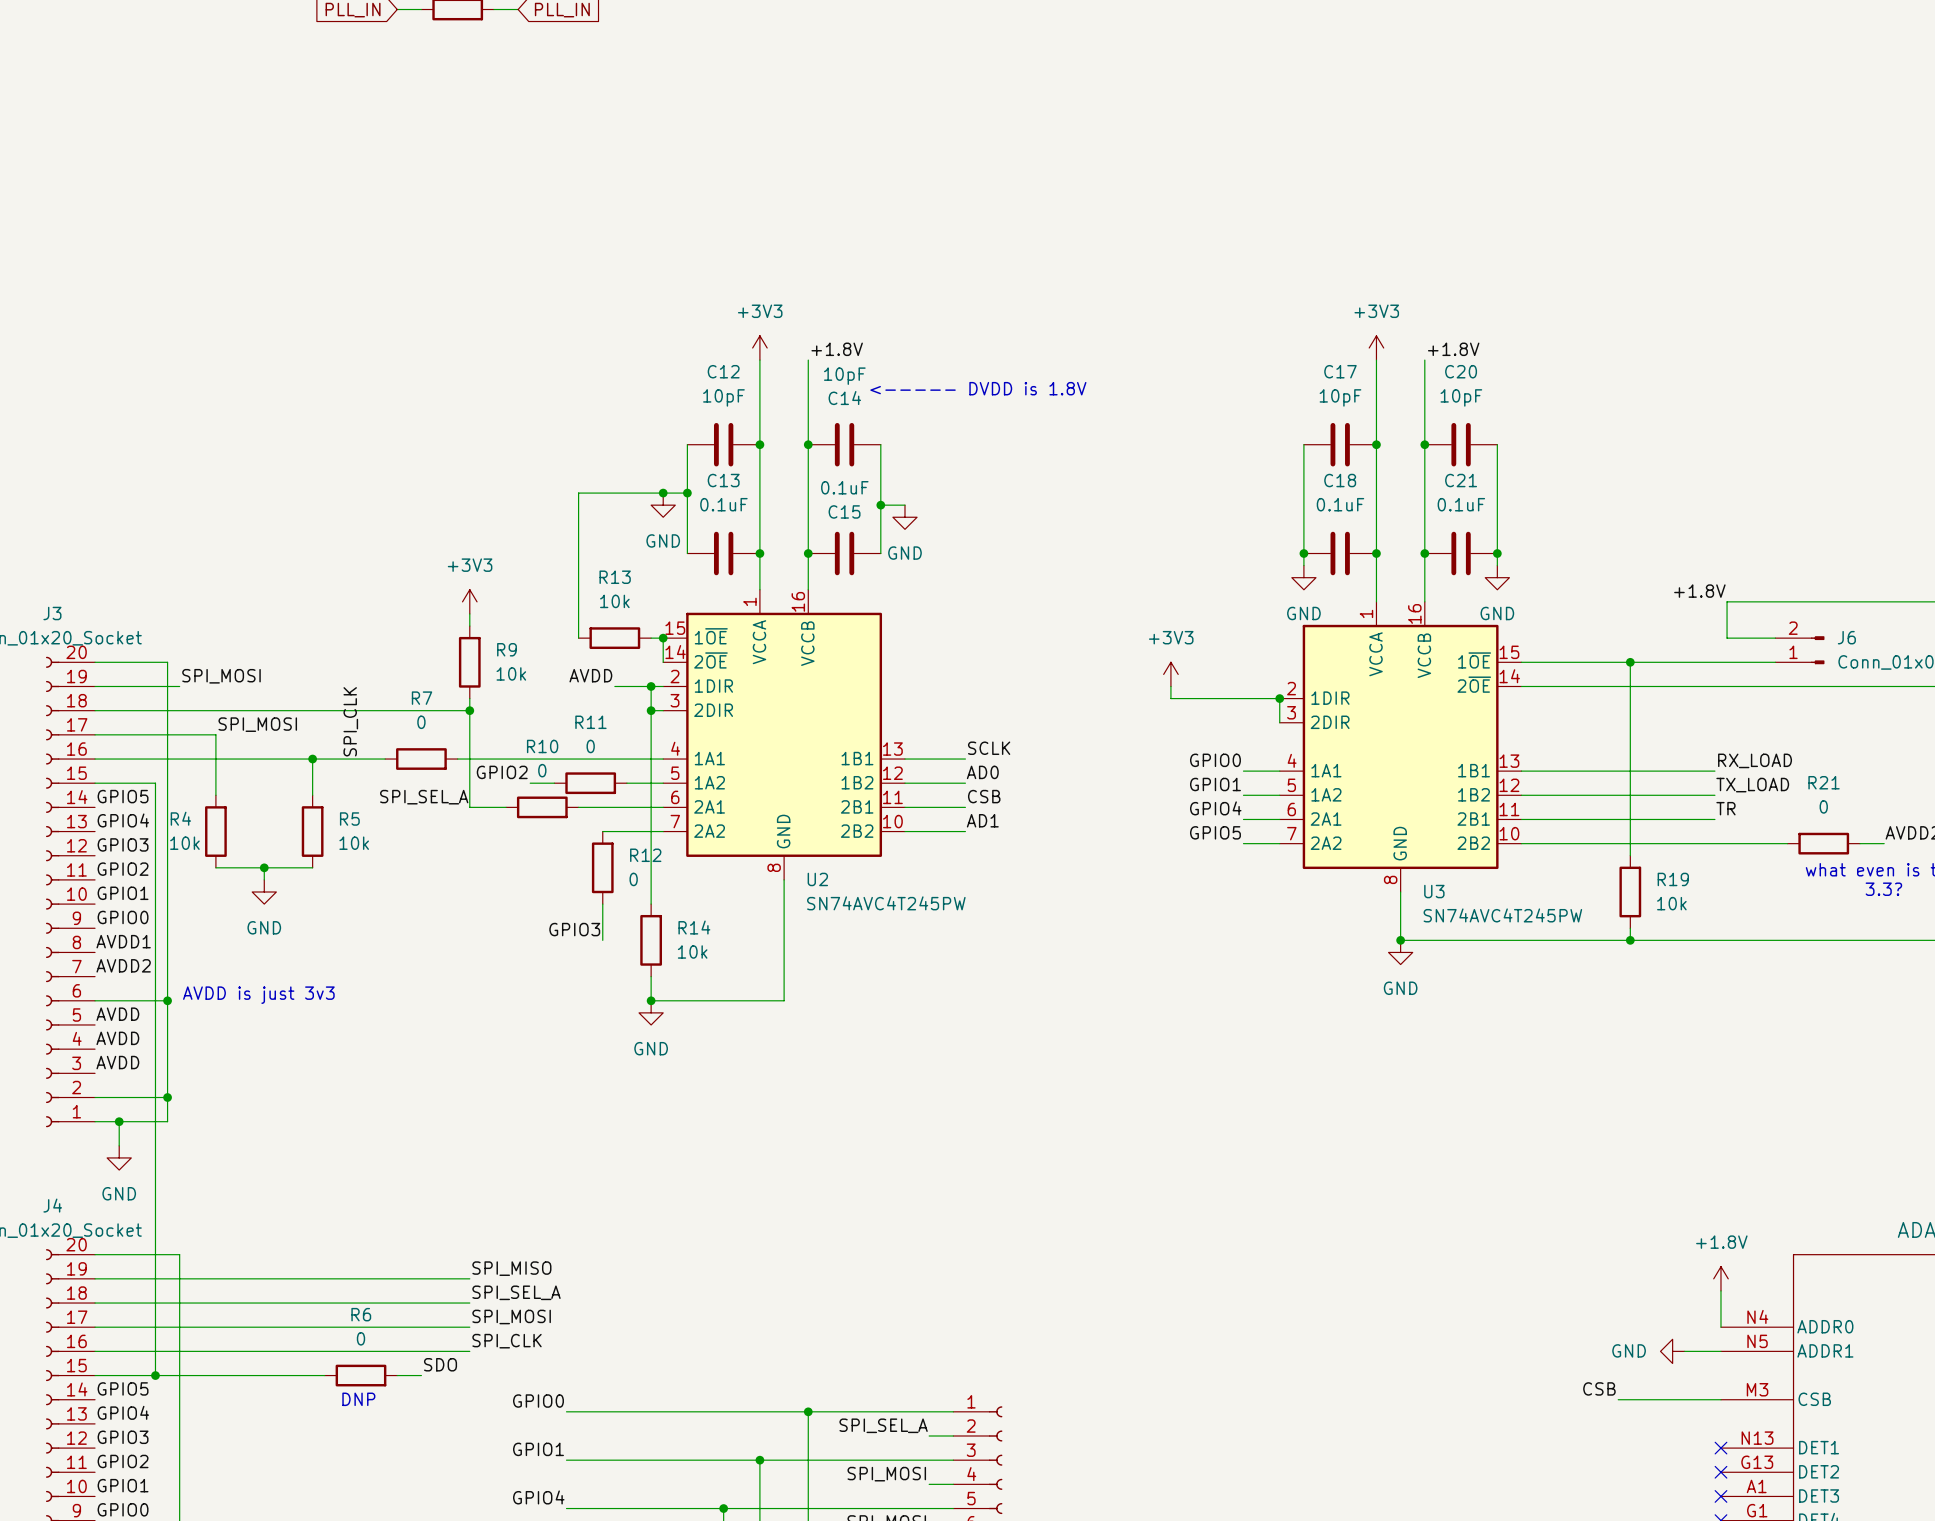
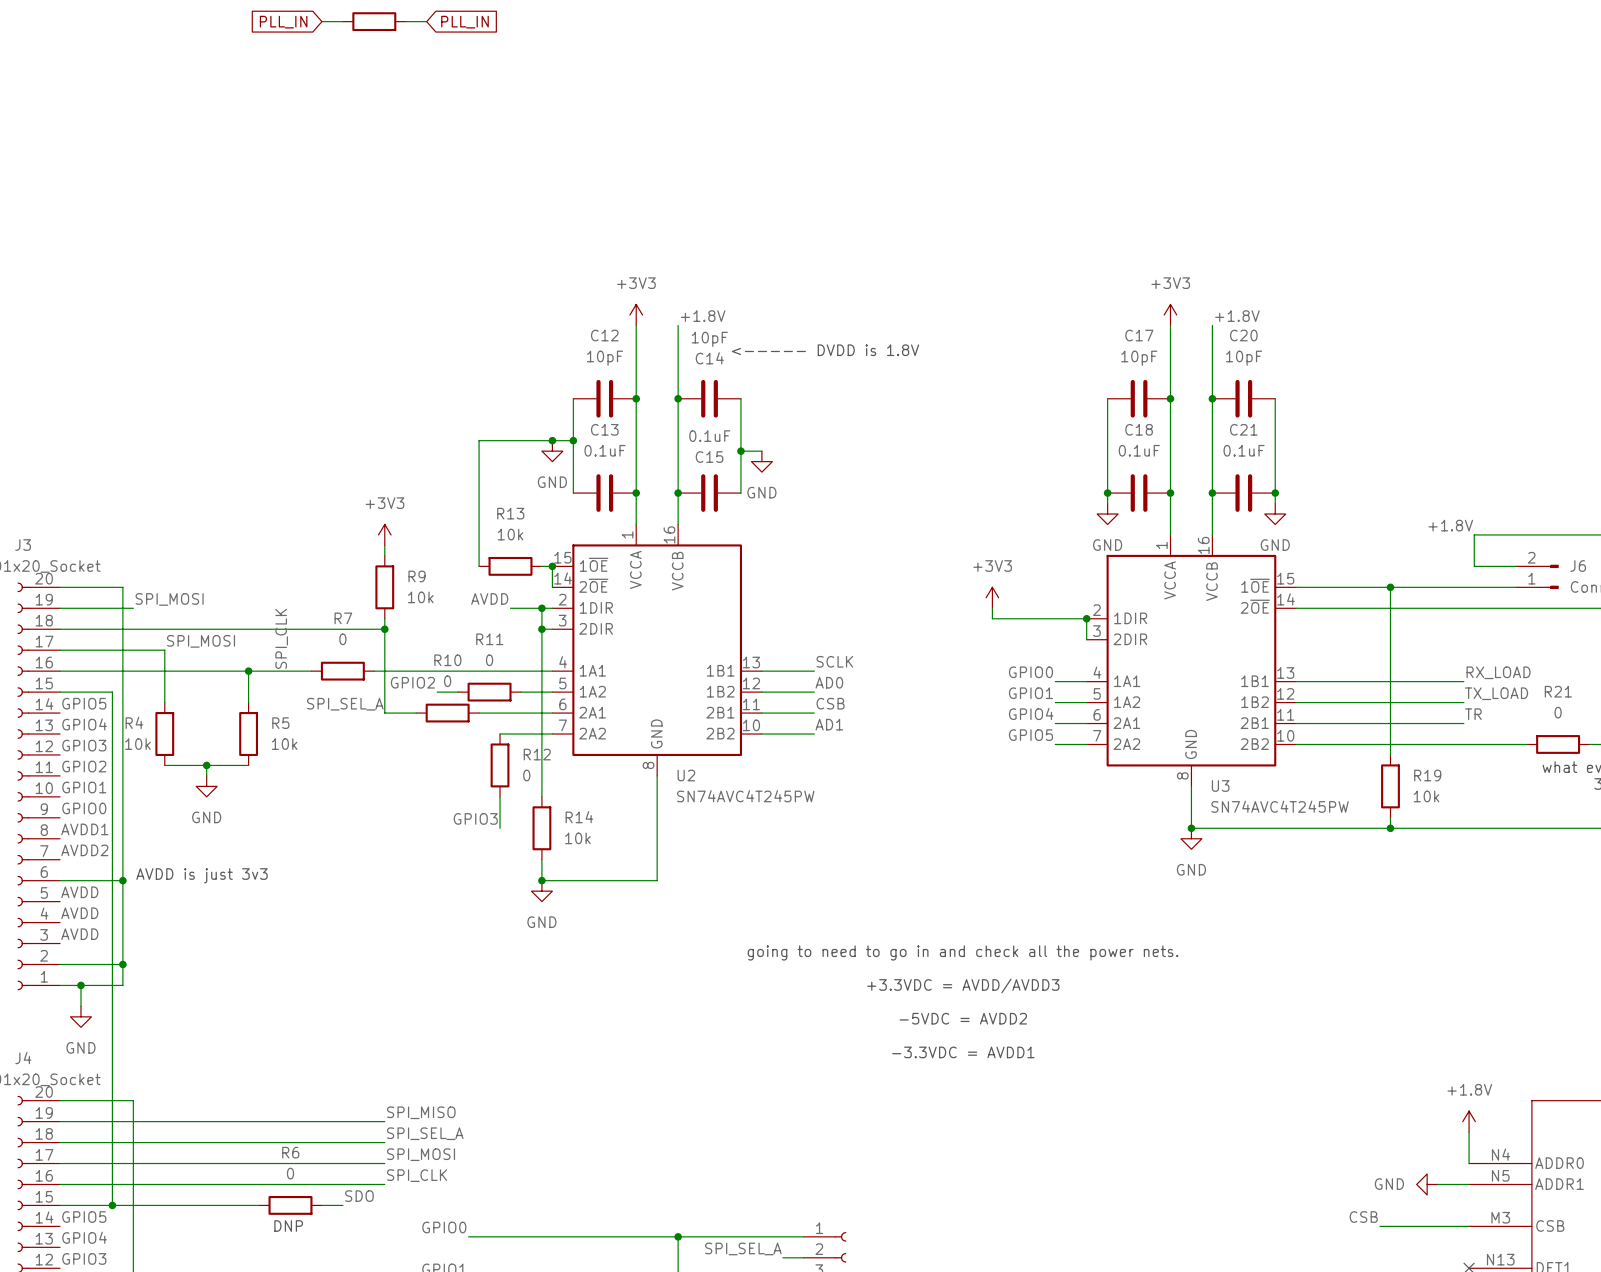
text: none -> going to need to go in and check all the power nets. (963, 952)
text: none -> +3.3VDC = AVDD/AVDD3 (963, 985)
text: none -> -5VDC = AVDD2 (963, 1018)
text: none -> -3.3VDC = AVDD1 (963, 1052)

